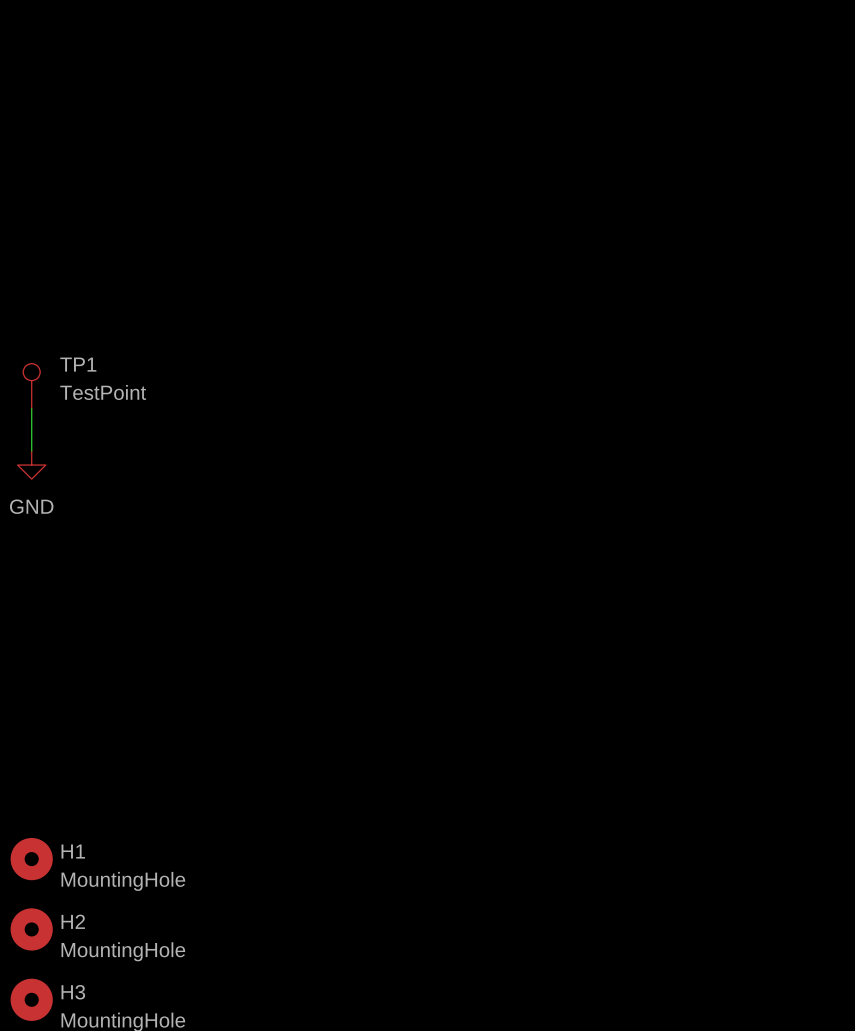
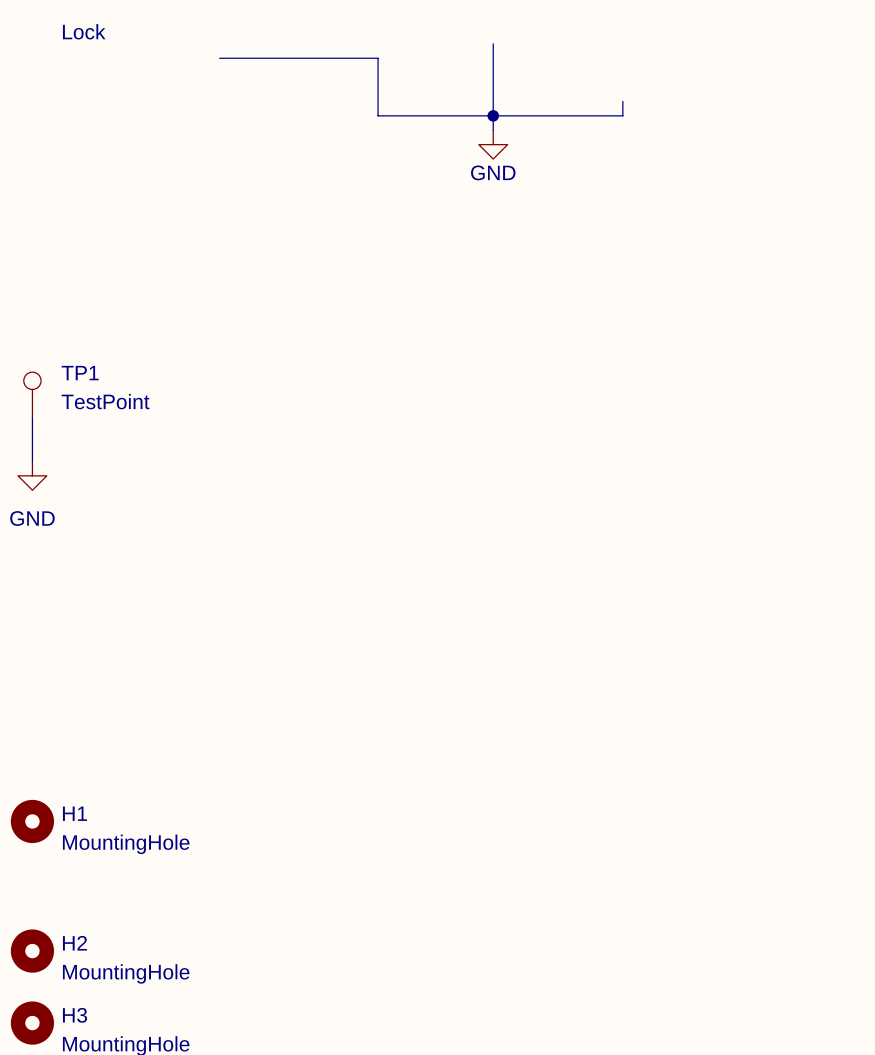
text: none -> Lock (84, 31)
wire: none -> (493, 43) (493, 130)
wire: none -> (219, 58) (378, 58) (378, 115) (622, 115) (622, 101)
junction: none -> (493, 115)
power symbol: none -> GND (493, 144)
H1 position: (31, 859) -> (32, 821)

